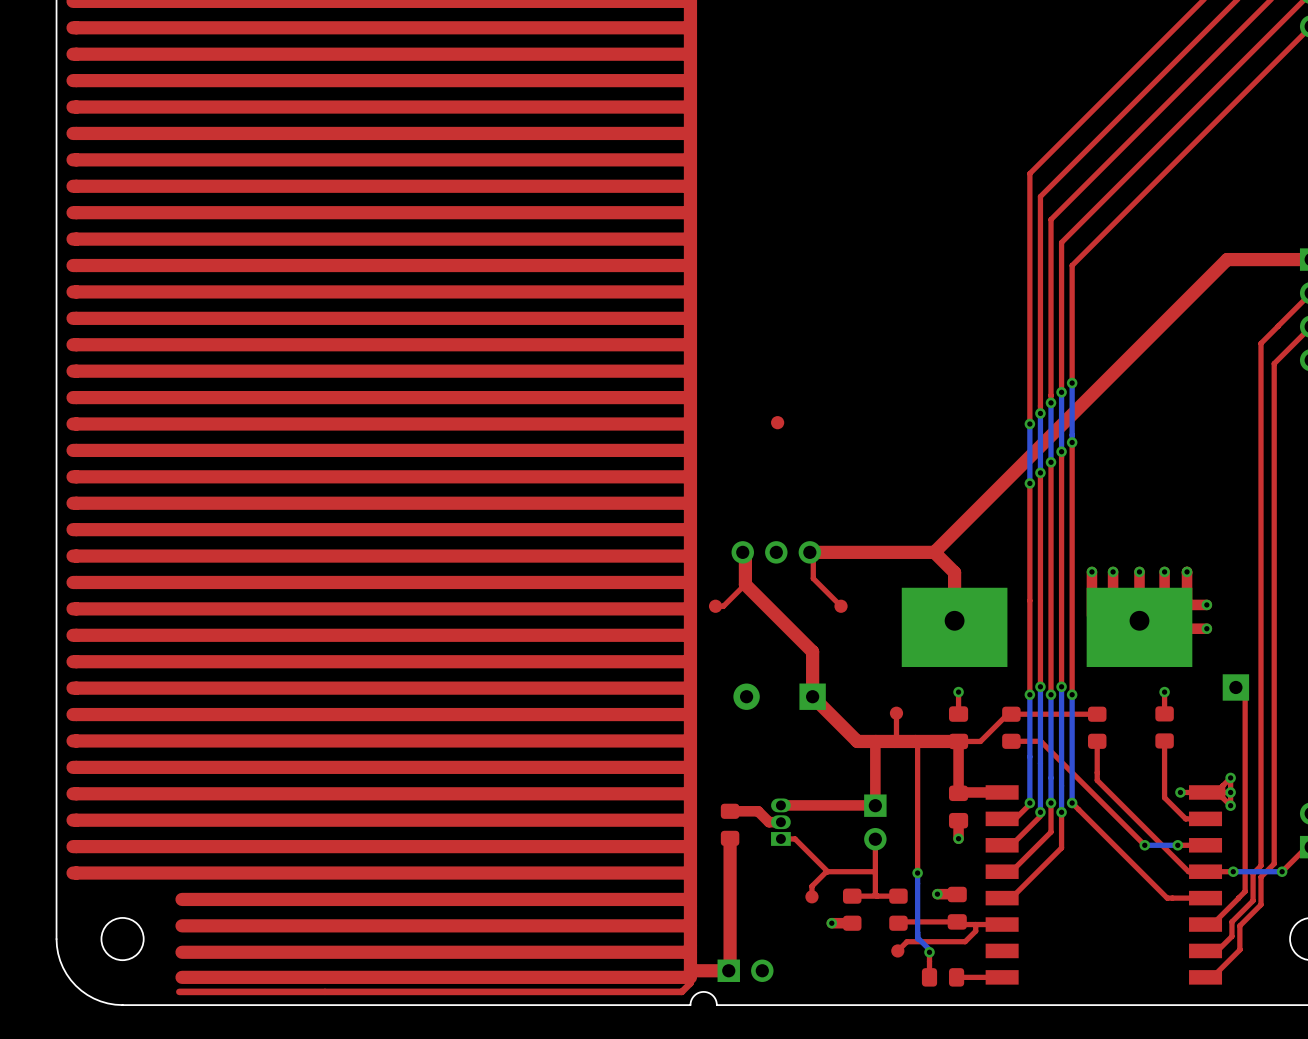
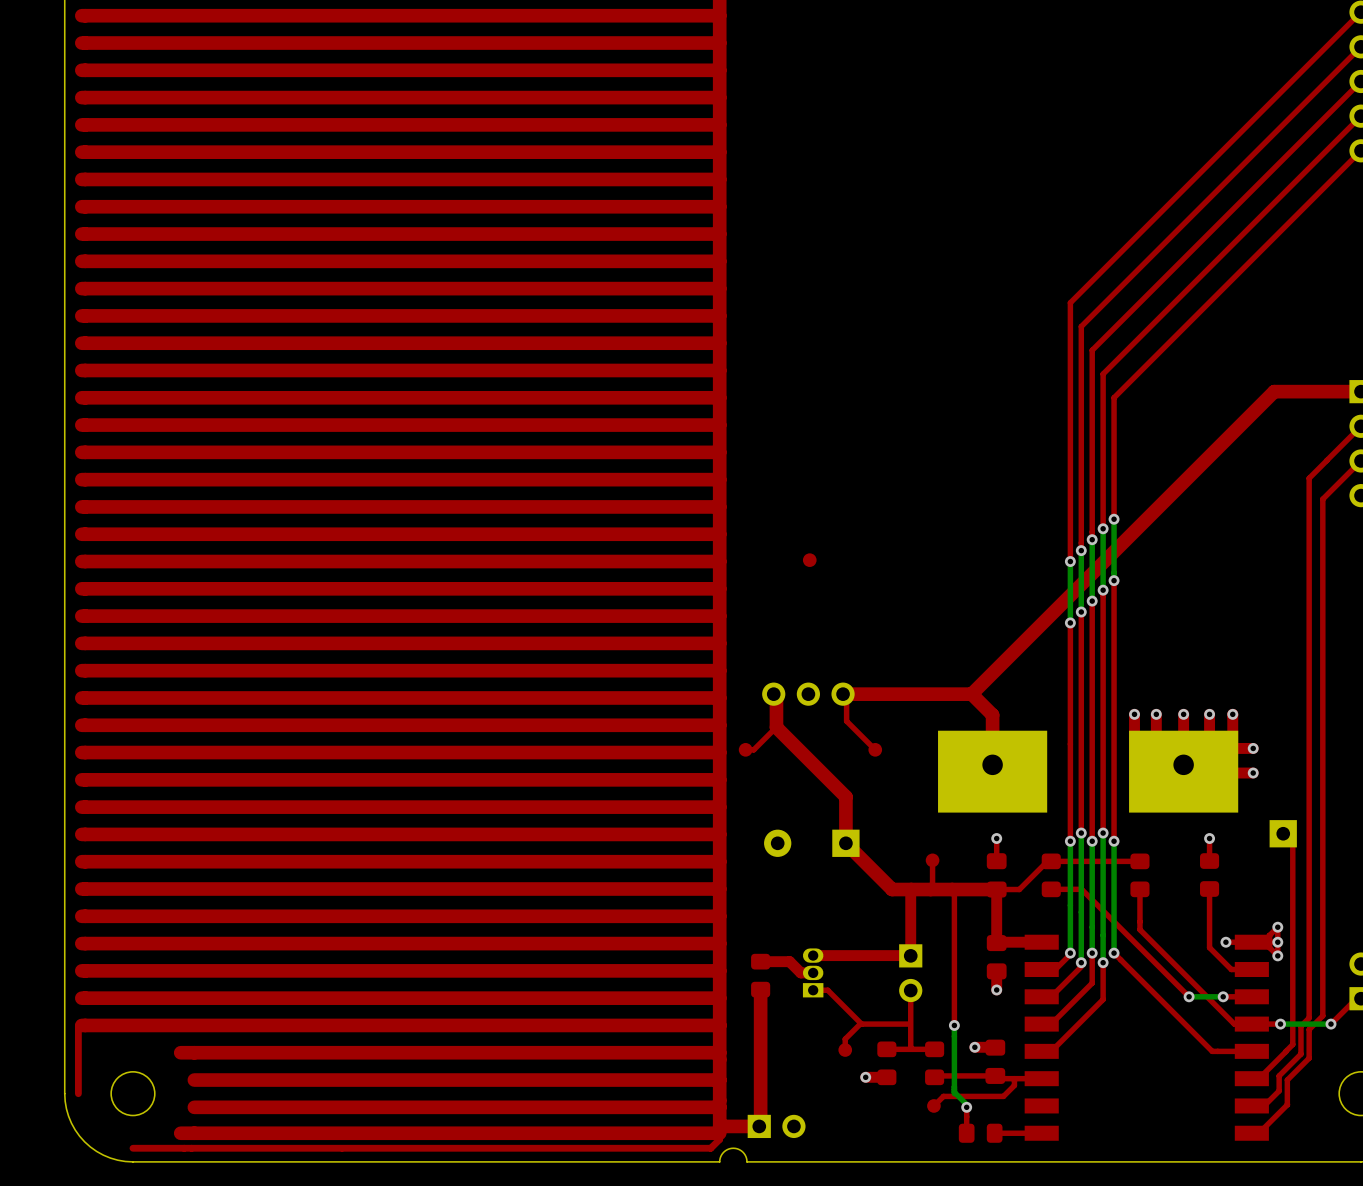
top track: none -> (78, 1025) (78, 1093)
top track: none -> (194, 1052) (180, 1052)
top track: none -> (194, 1133) (180, 1133)
top track: none -> (191, 1148) (132, 1148)

